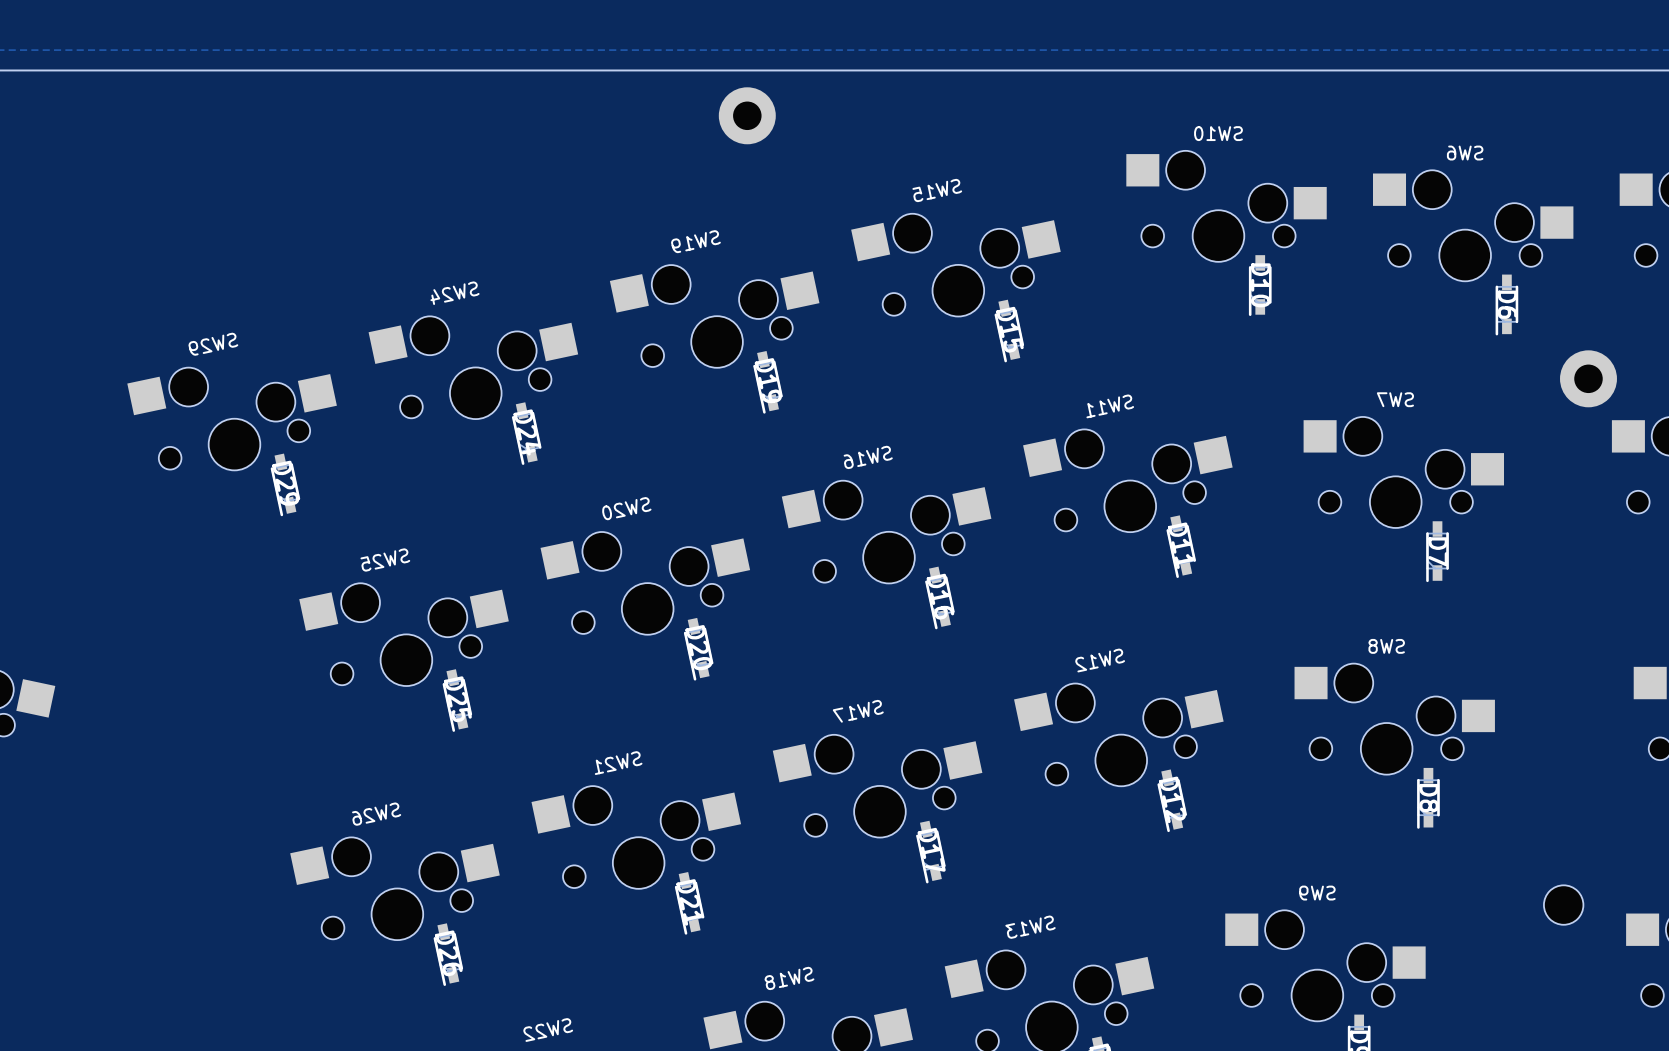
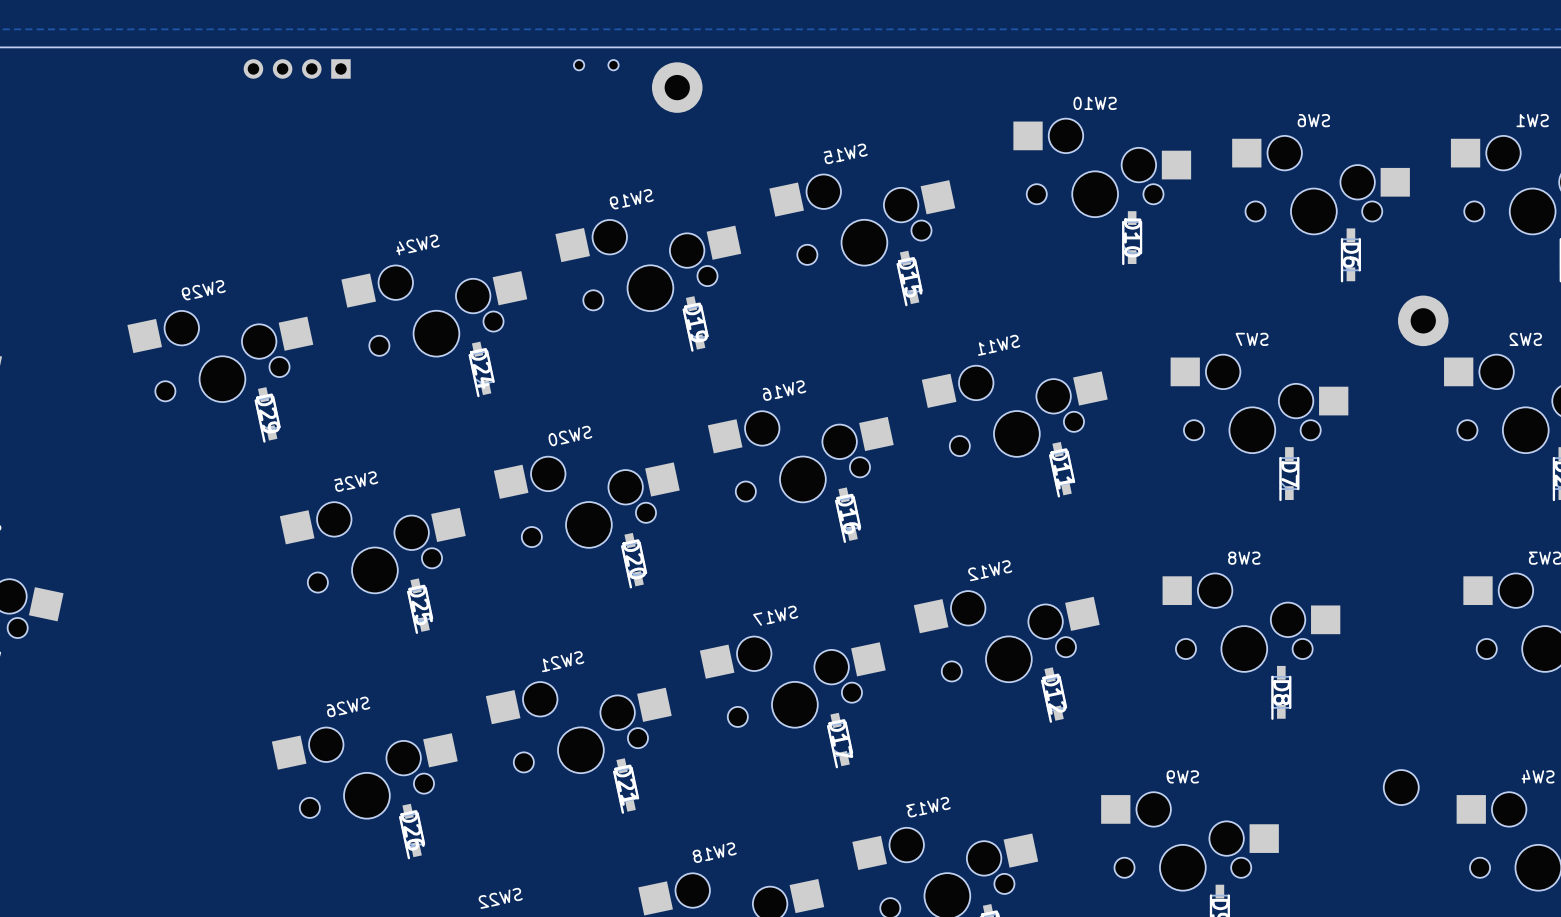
part: none -> (596, 65)
part: none -> (297, 68)

